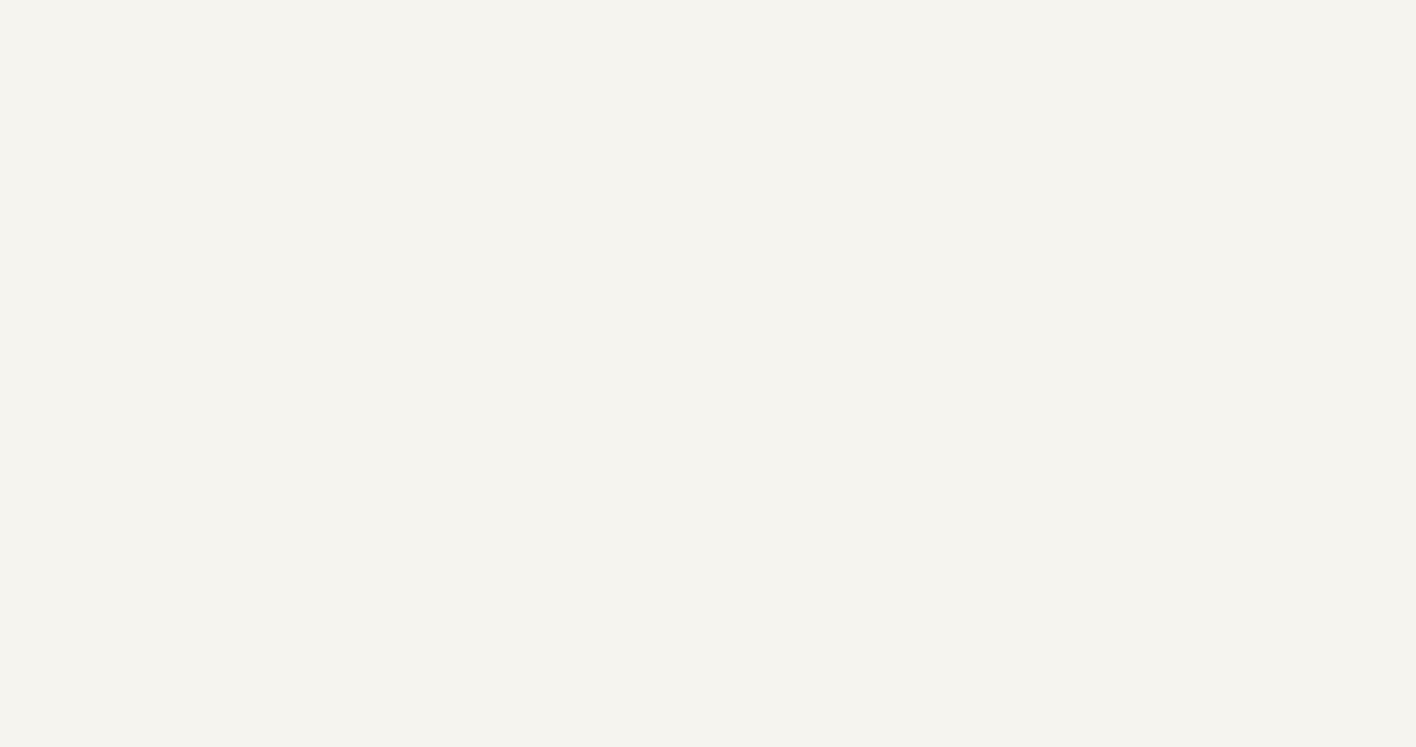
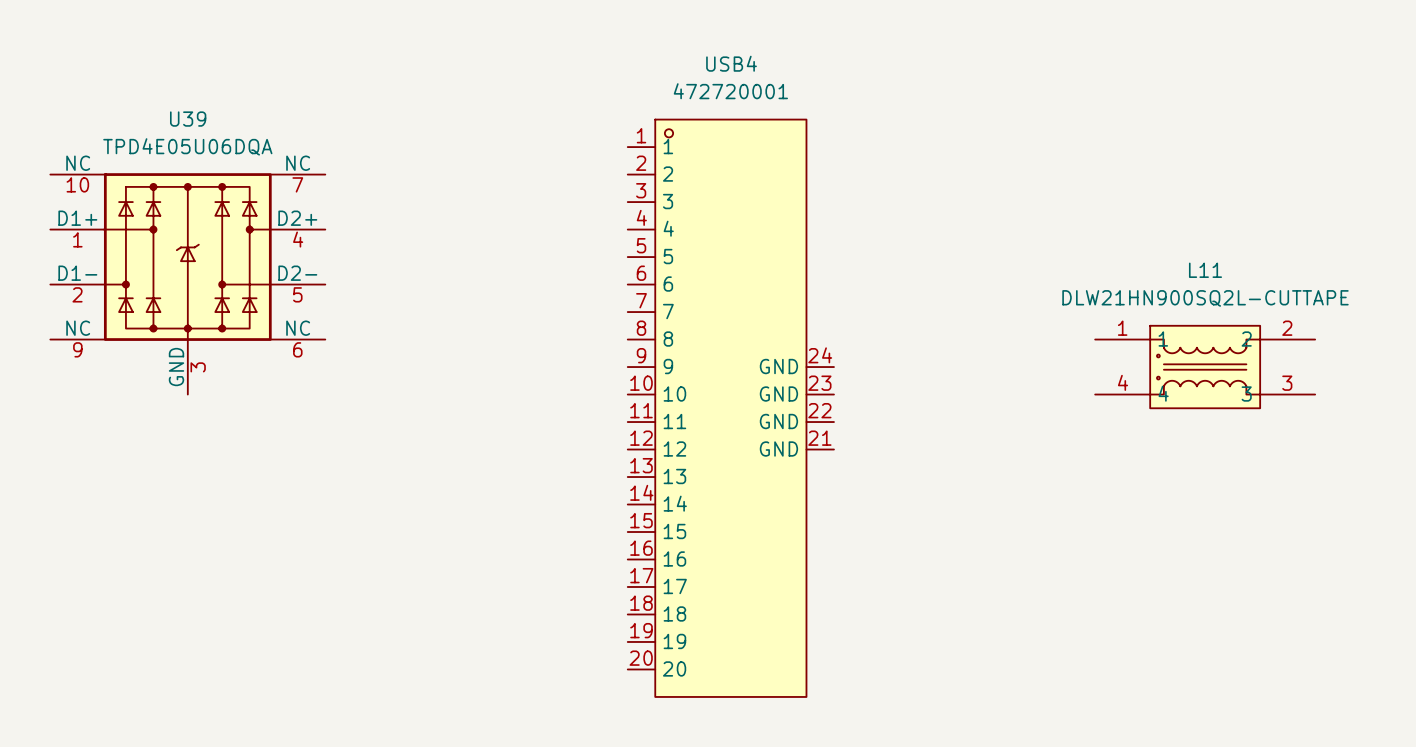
U39: none -> TPD4E05U06DQA (187, 283)
L11: none -> DLW21HN900SQ2L-CUTTAPE (1205, 367)
USB4: none -> 472720001 (730, 408)

